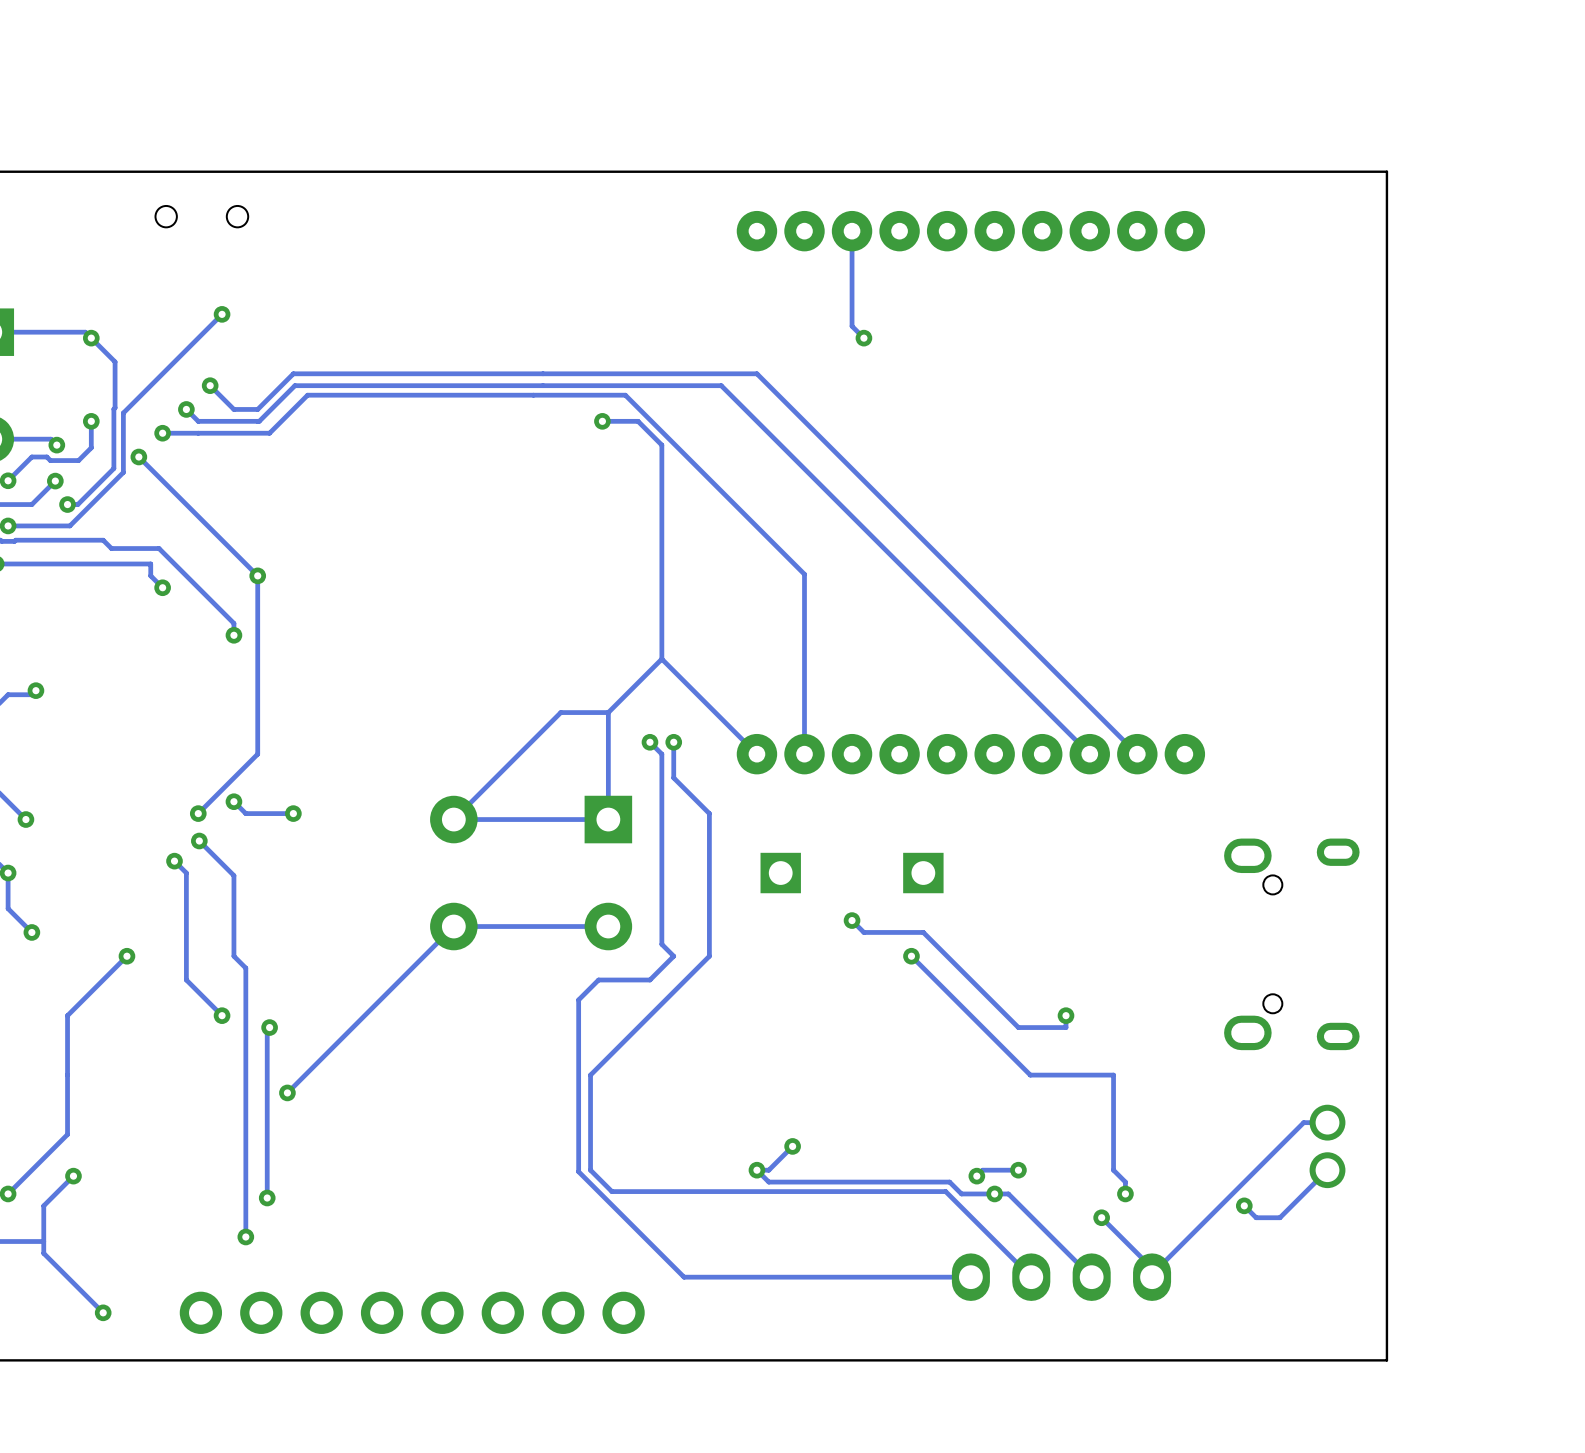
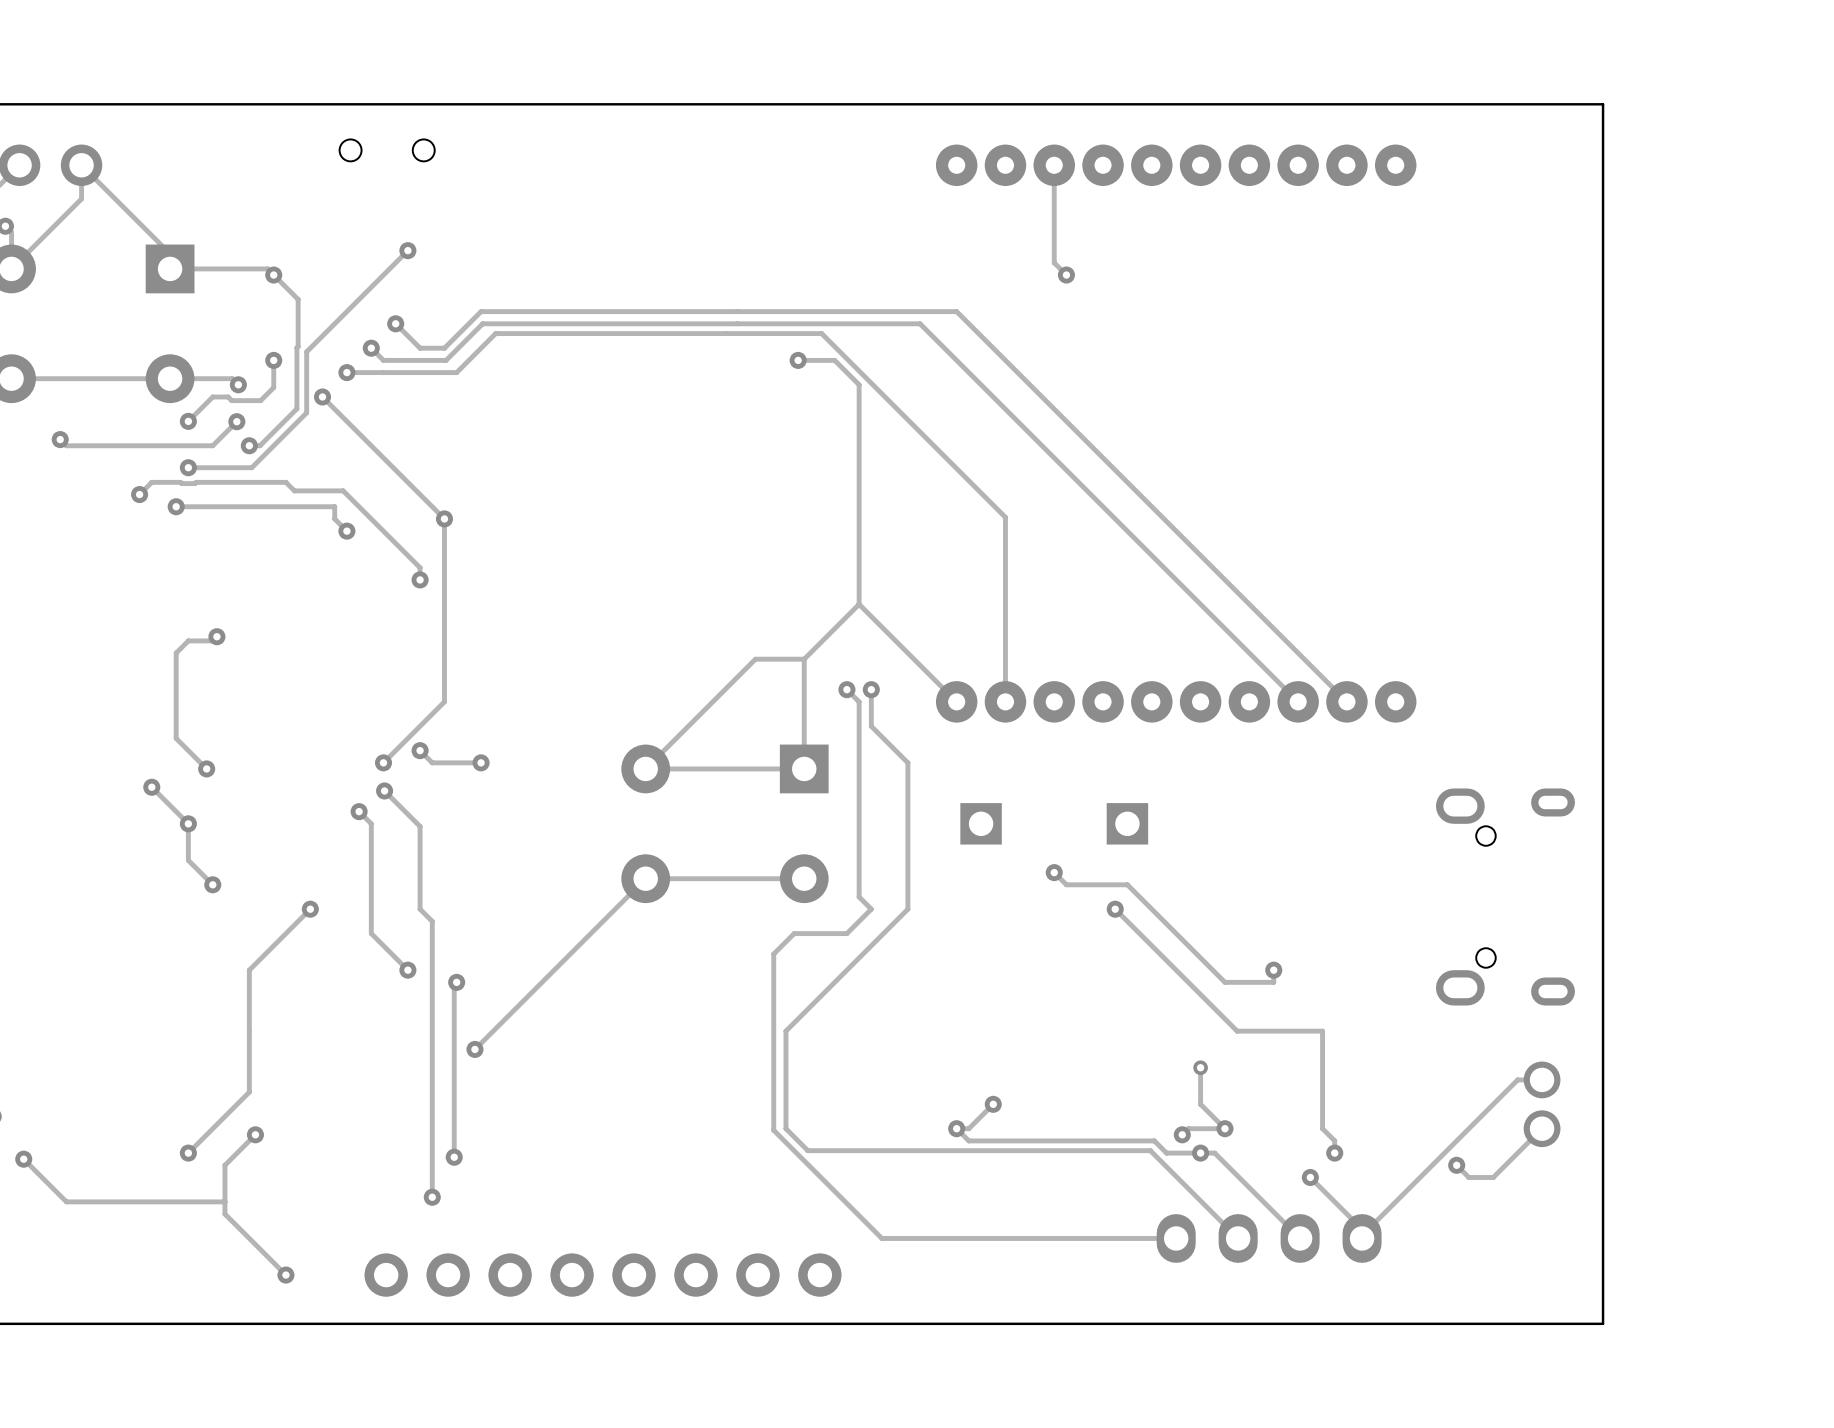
track: none -> (1200, 1067) (1200, 1104) (1224, 1128)
via: none -> (1200, 1067)

